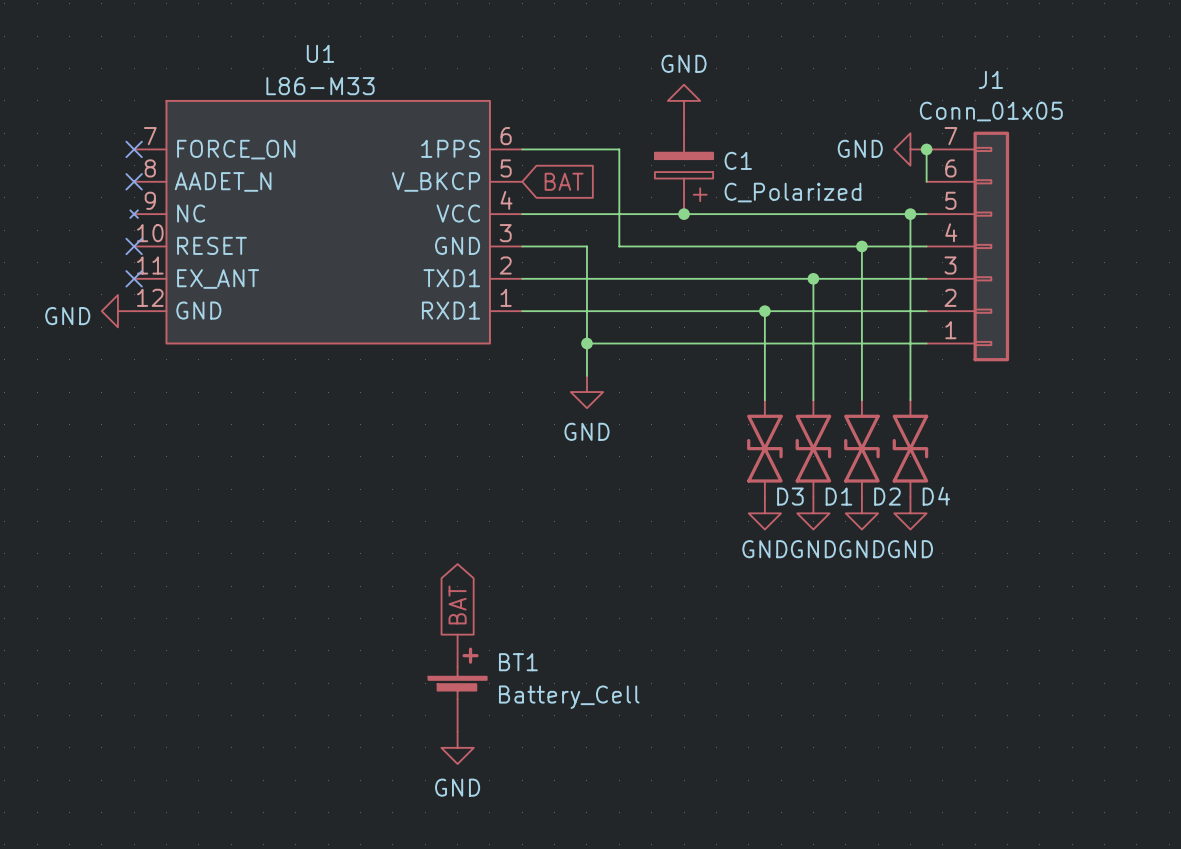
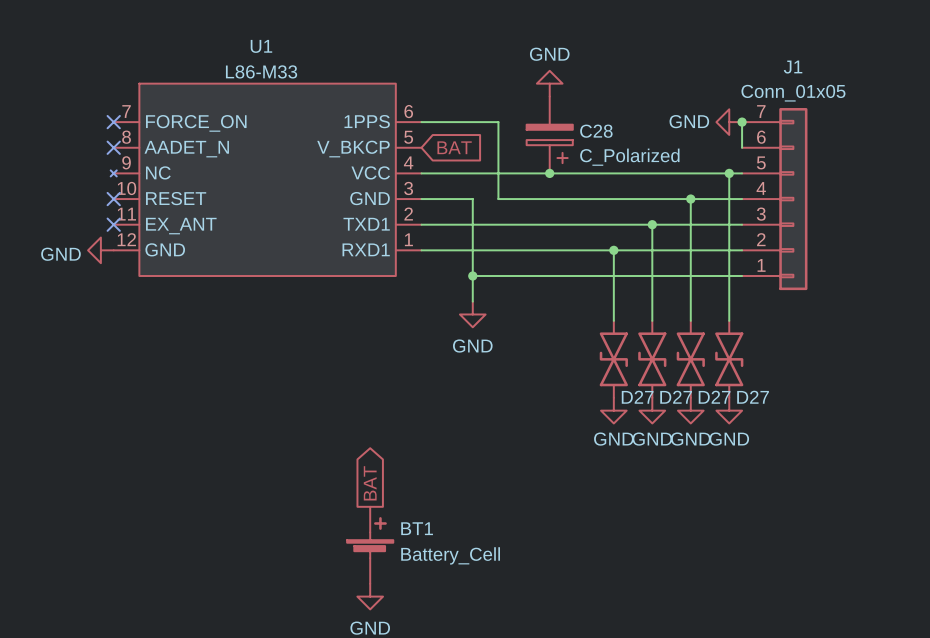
C1 name: C1 (738, 160) -> C28 (596, 131)
D3 name: D3 (790, 496) -> D27 (637, 397)
D1 name: D1 (838, 496) -> D27 (676, 397)
D2 name: D2 (887, 496) -> D27 (714, 397)
D4 name: D4 (936, 496) -> D27 (753, 397)

